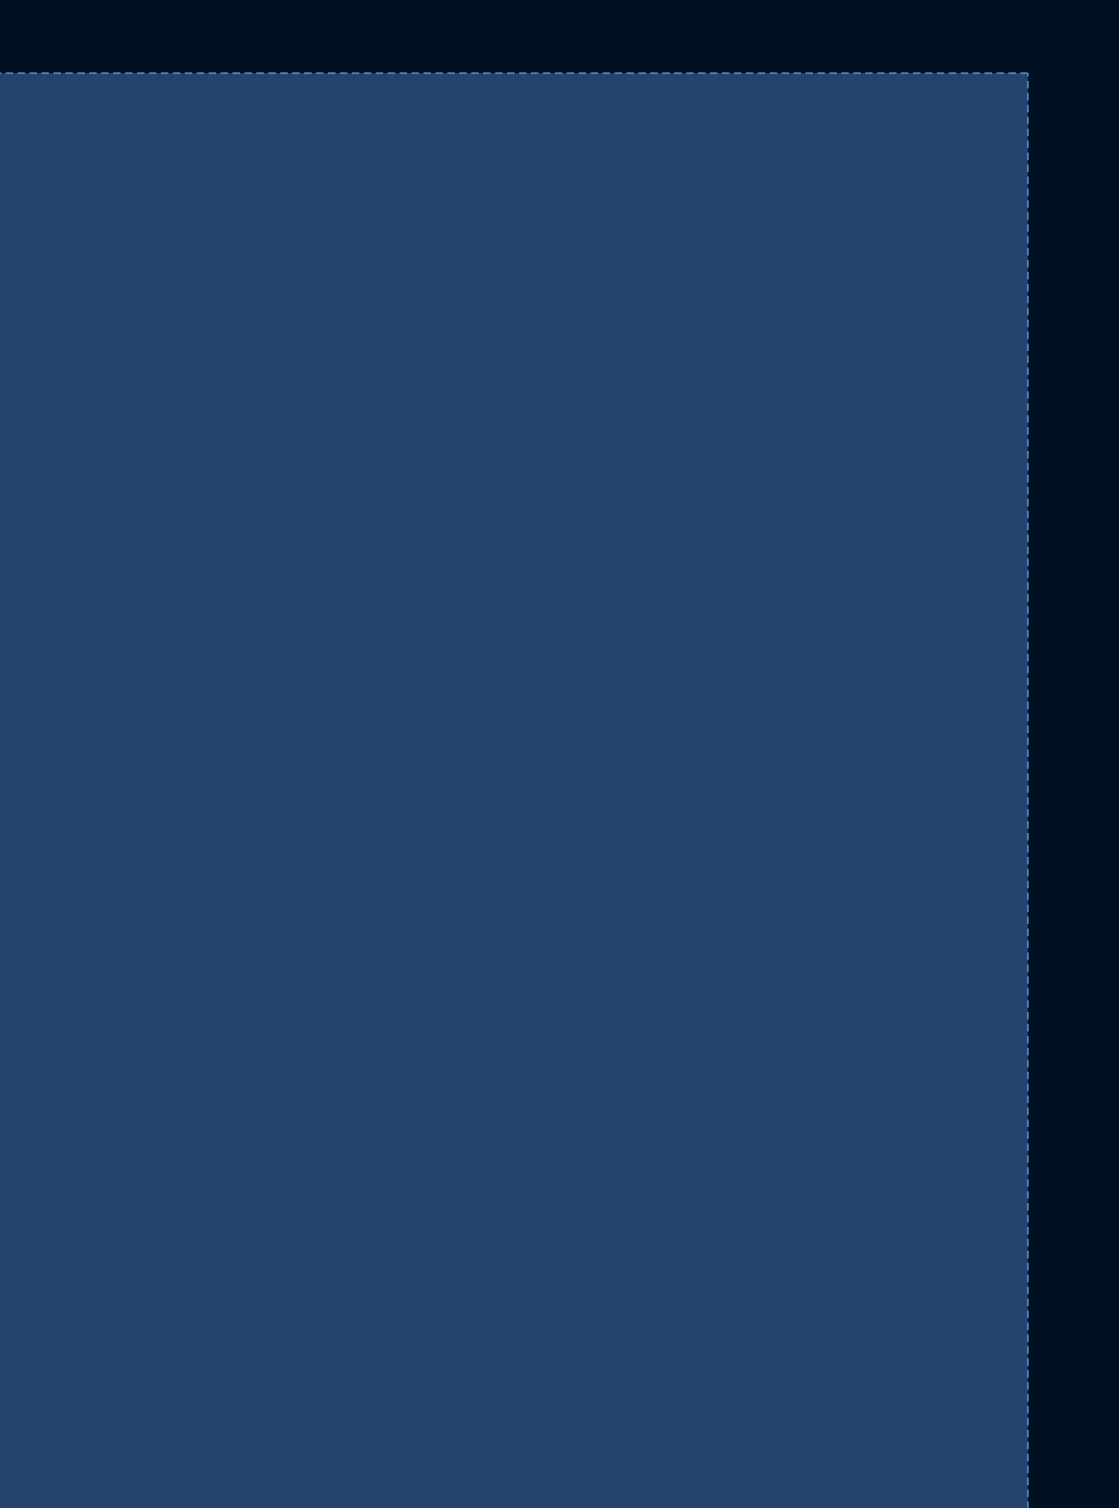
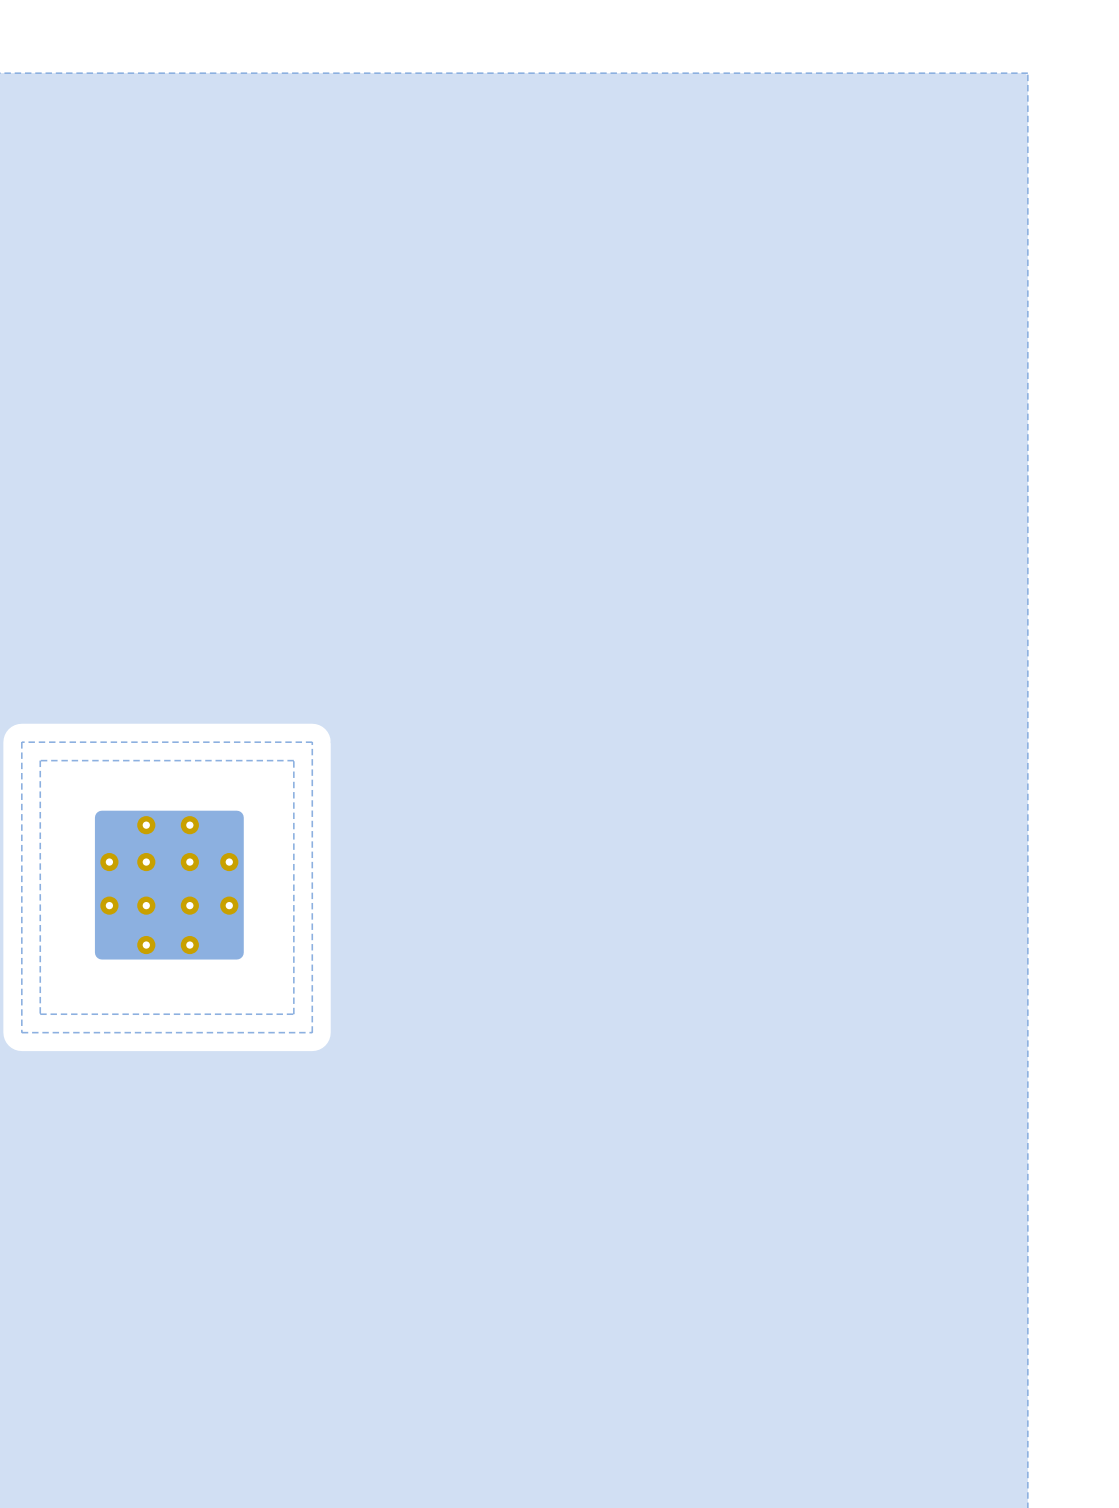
zone outline: none -> (312, 742) (312, 1032) (21, 1032) (21, 742) (312, 742)
zone outline: none -> (293, 760) (293, 1014) (40, 1014) (40, 760) (293, 760)
part: none -> (169, 885)

